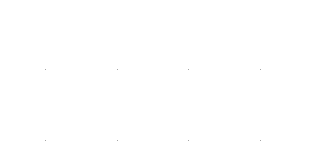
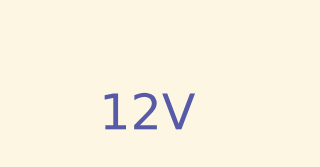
text: none -> 12V (149, 111)

